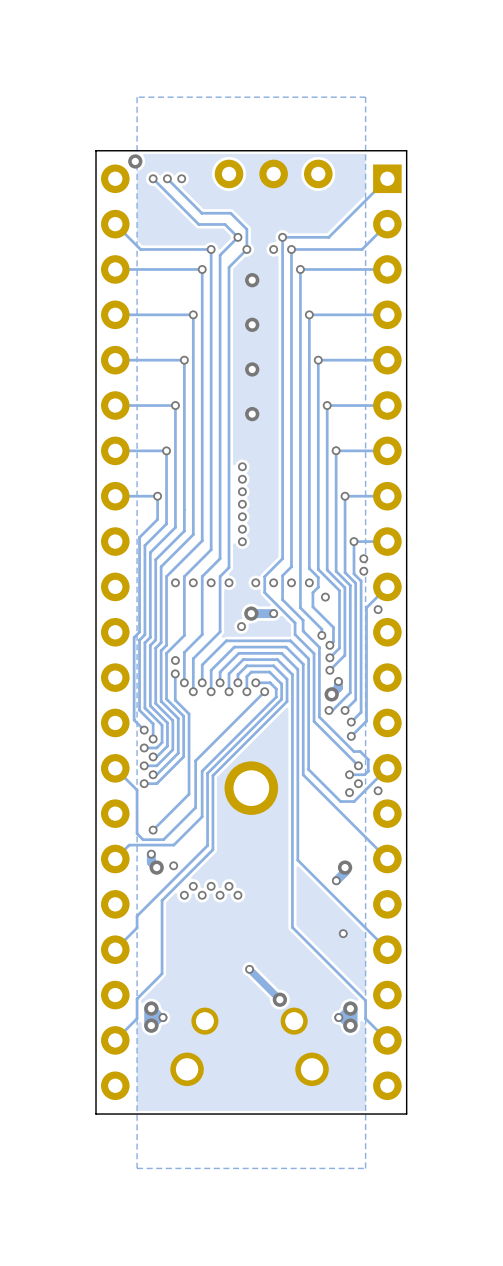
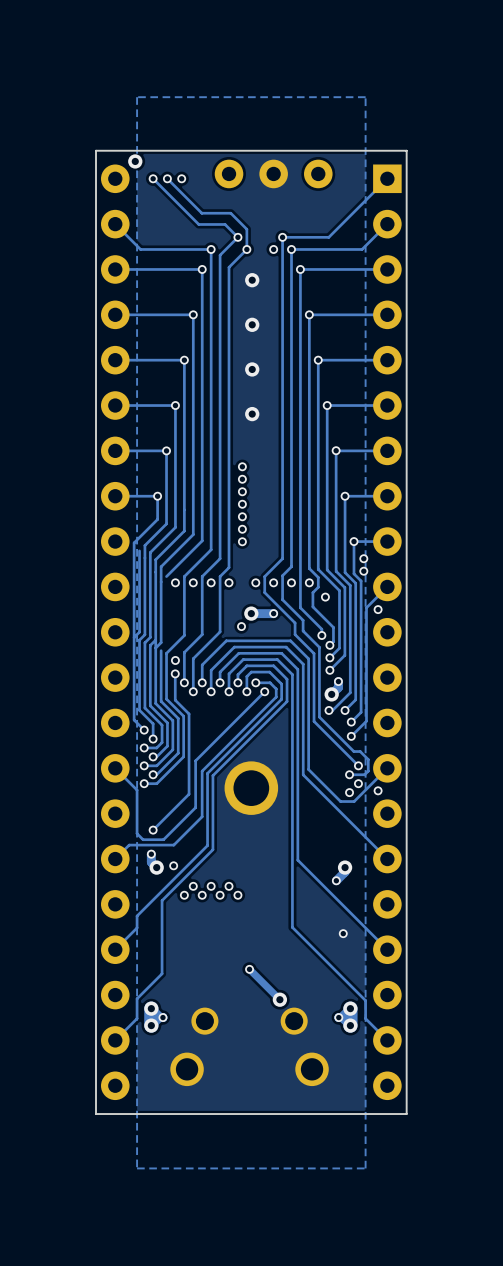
track: (139, 537) (139, 550) -> (139, 537) (134, 542) (134, 637)
track: (166, 576) (166, 645) (161, 650) -> none

